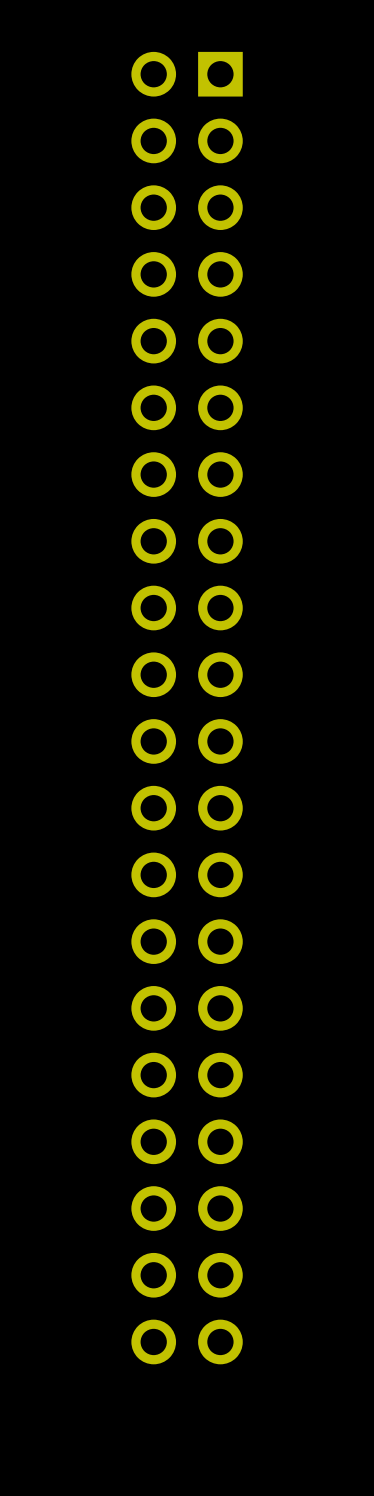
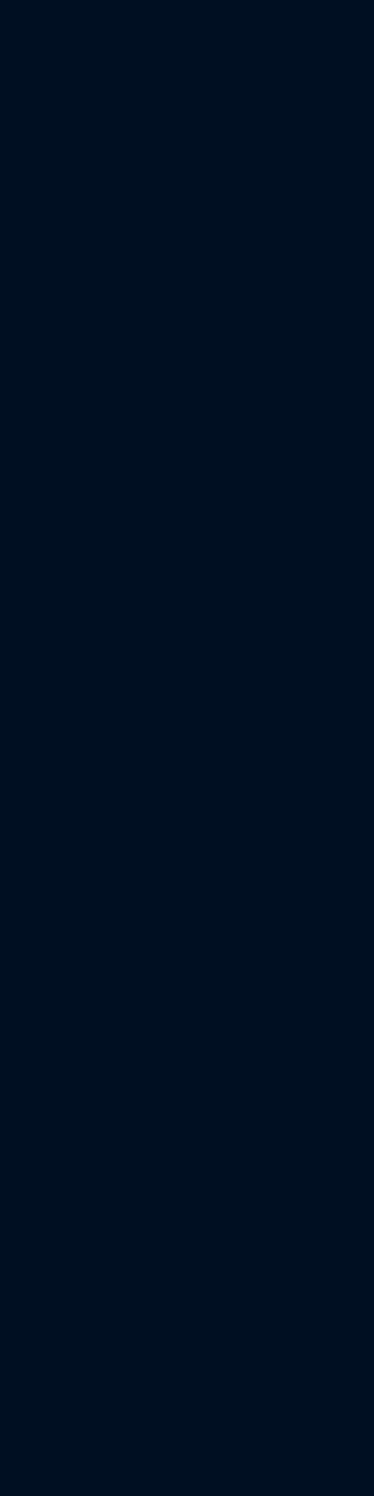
part: (187, 708) -> none

